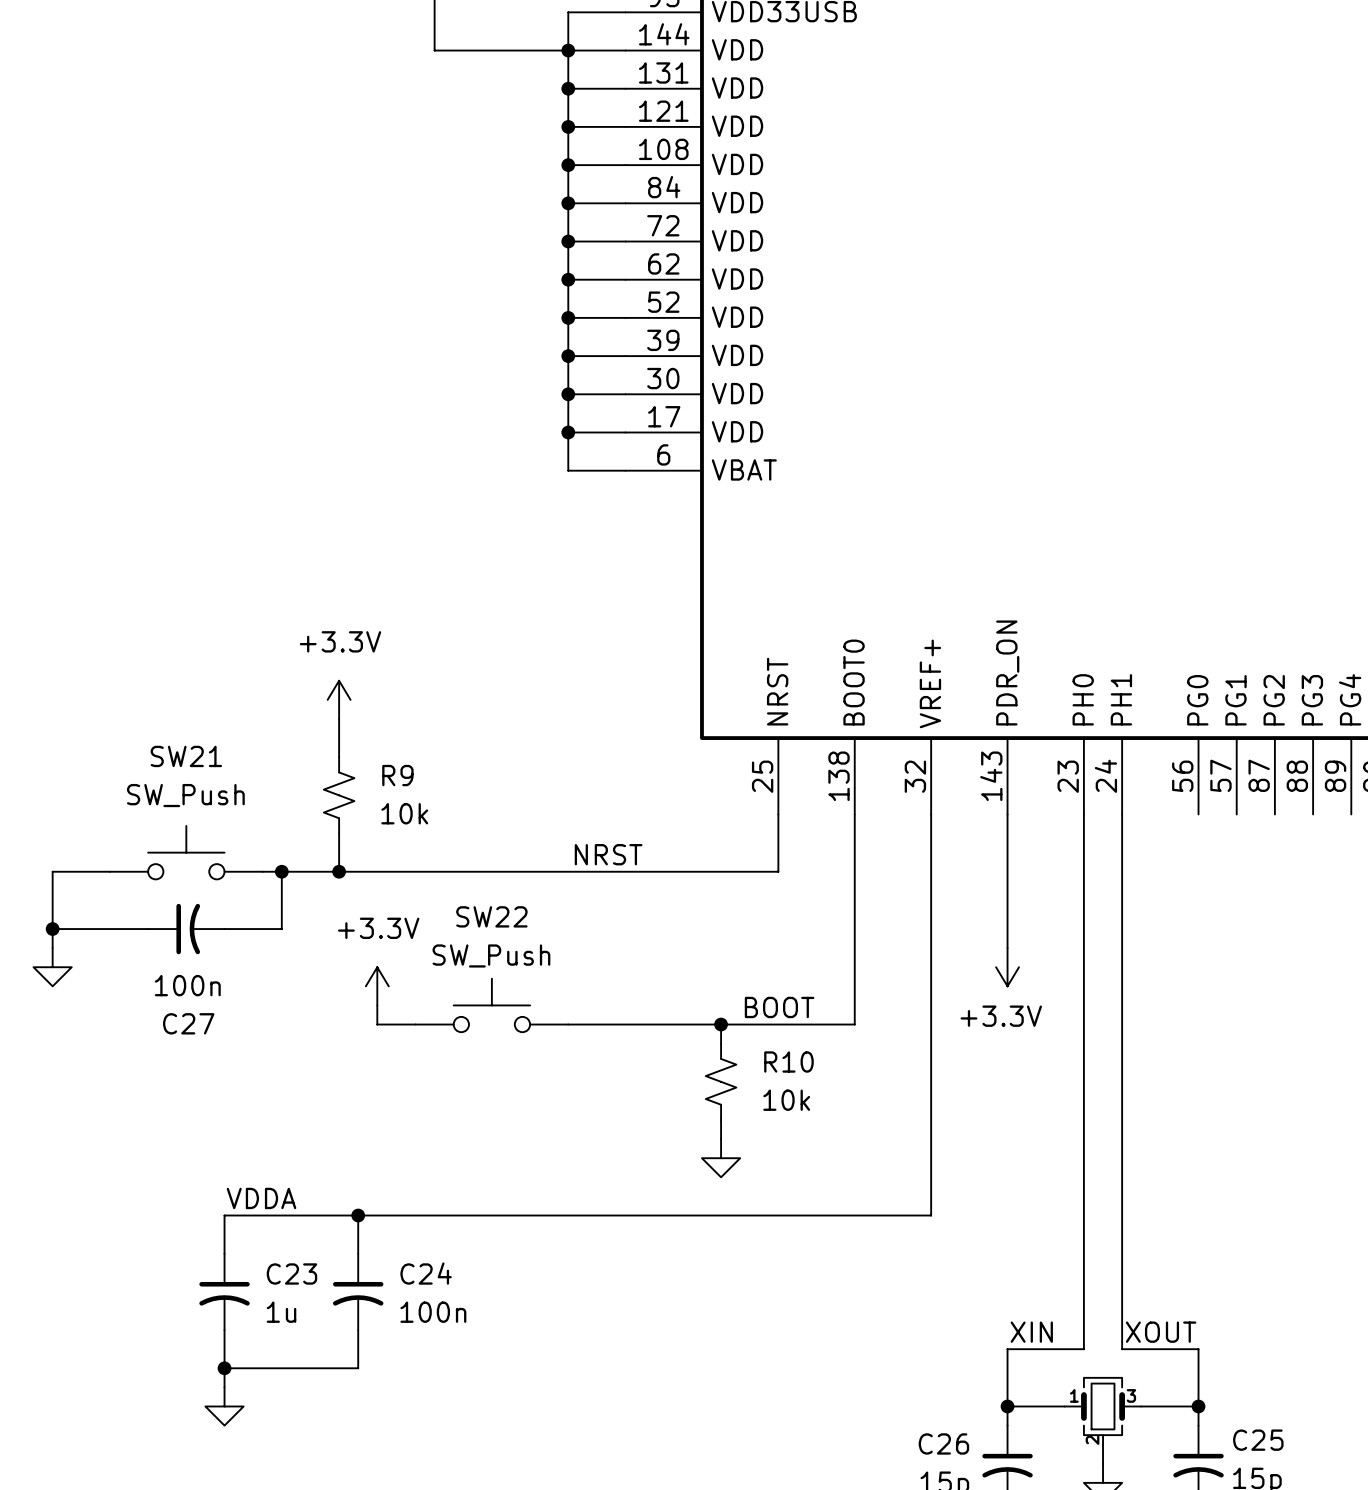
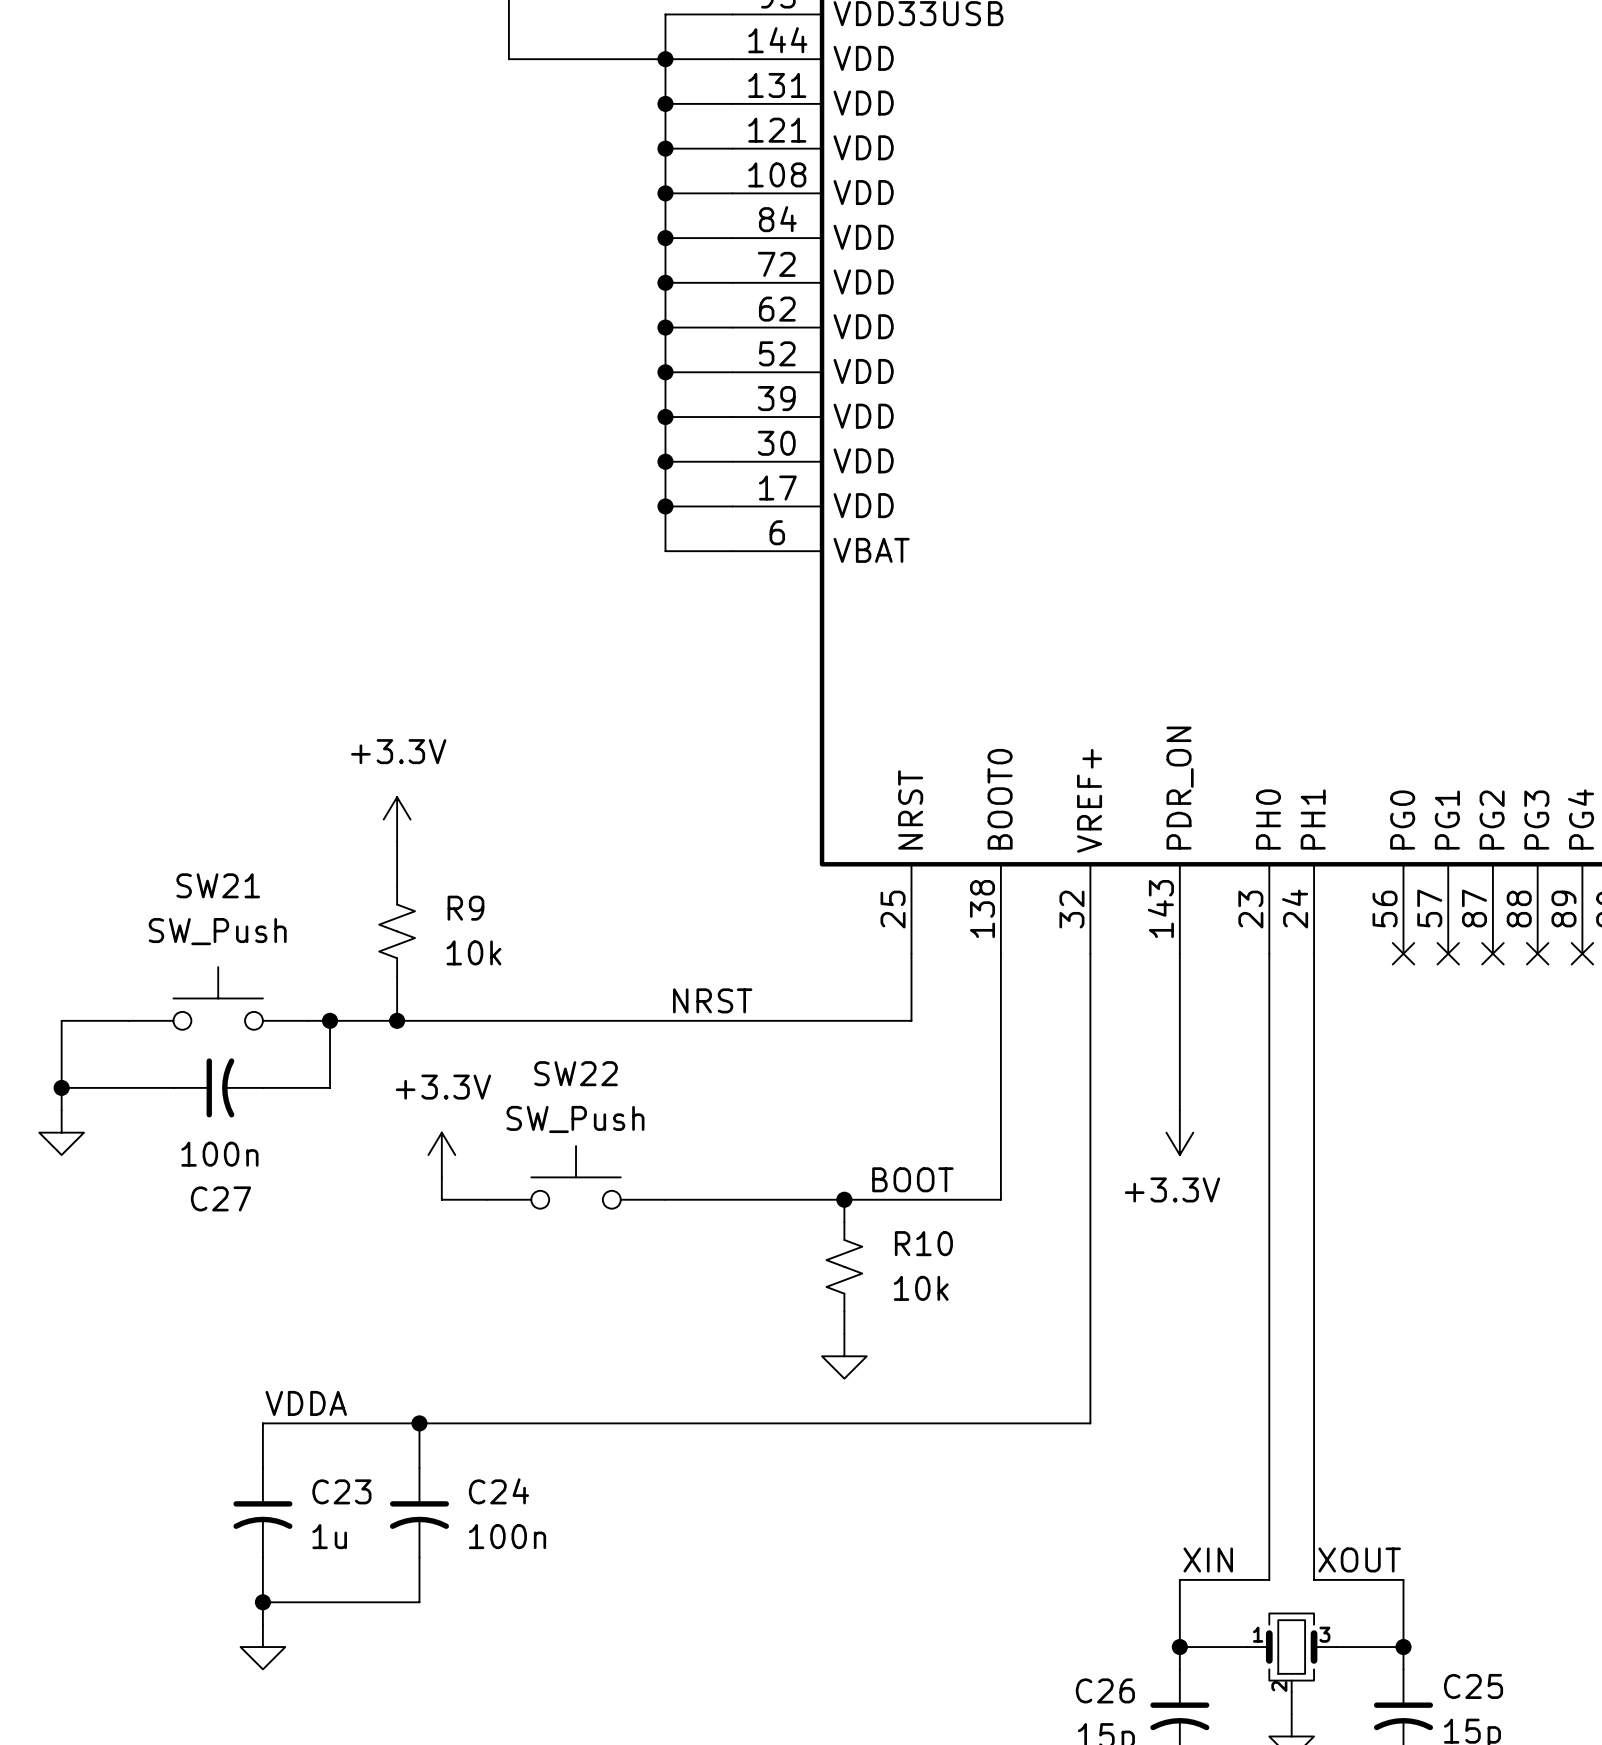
no-connect mark: none -> (1403, 953)
no-connect mark: none -> (1448, 953)
no-connect mark: none -> (1492, 953)
no-connect mark: none -> (1537, 953)
no-connect mark: none -> (1582, 953)

